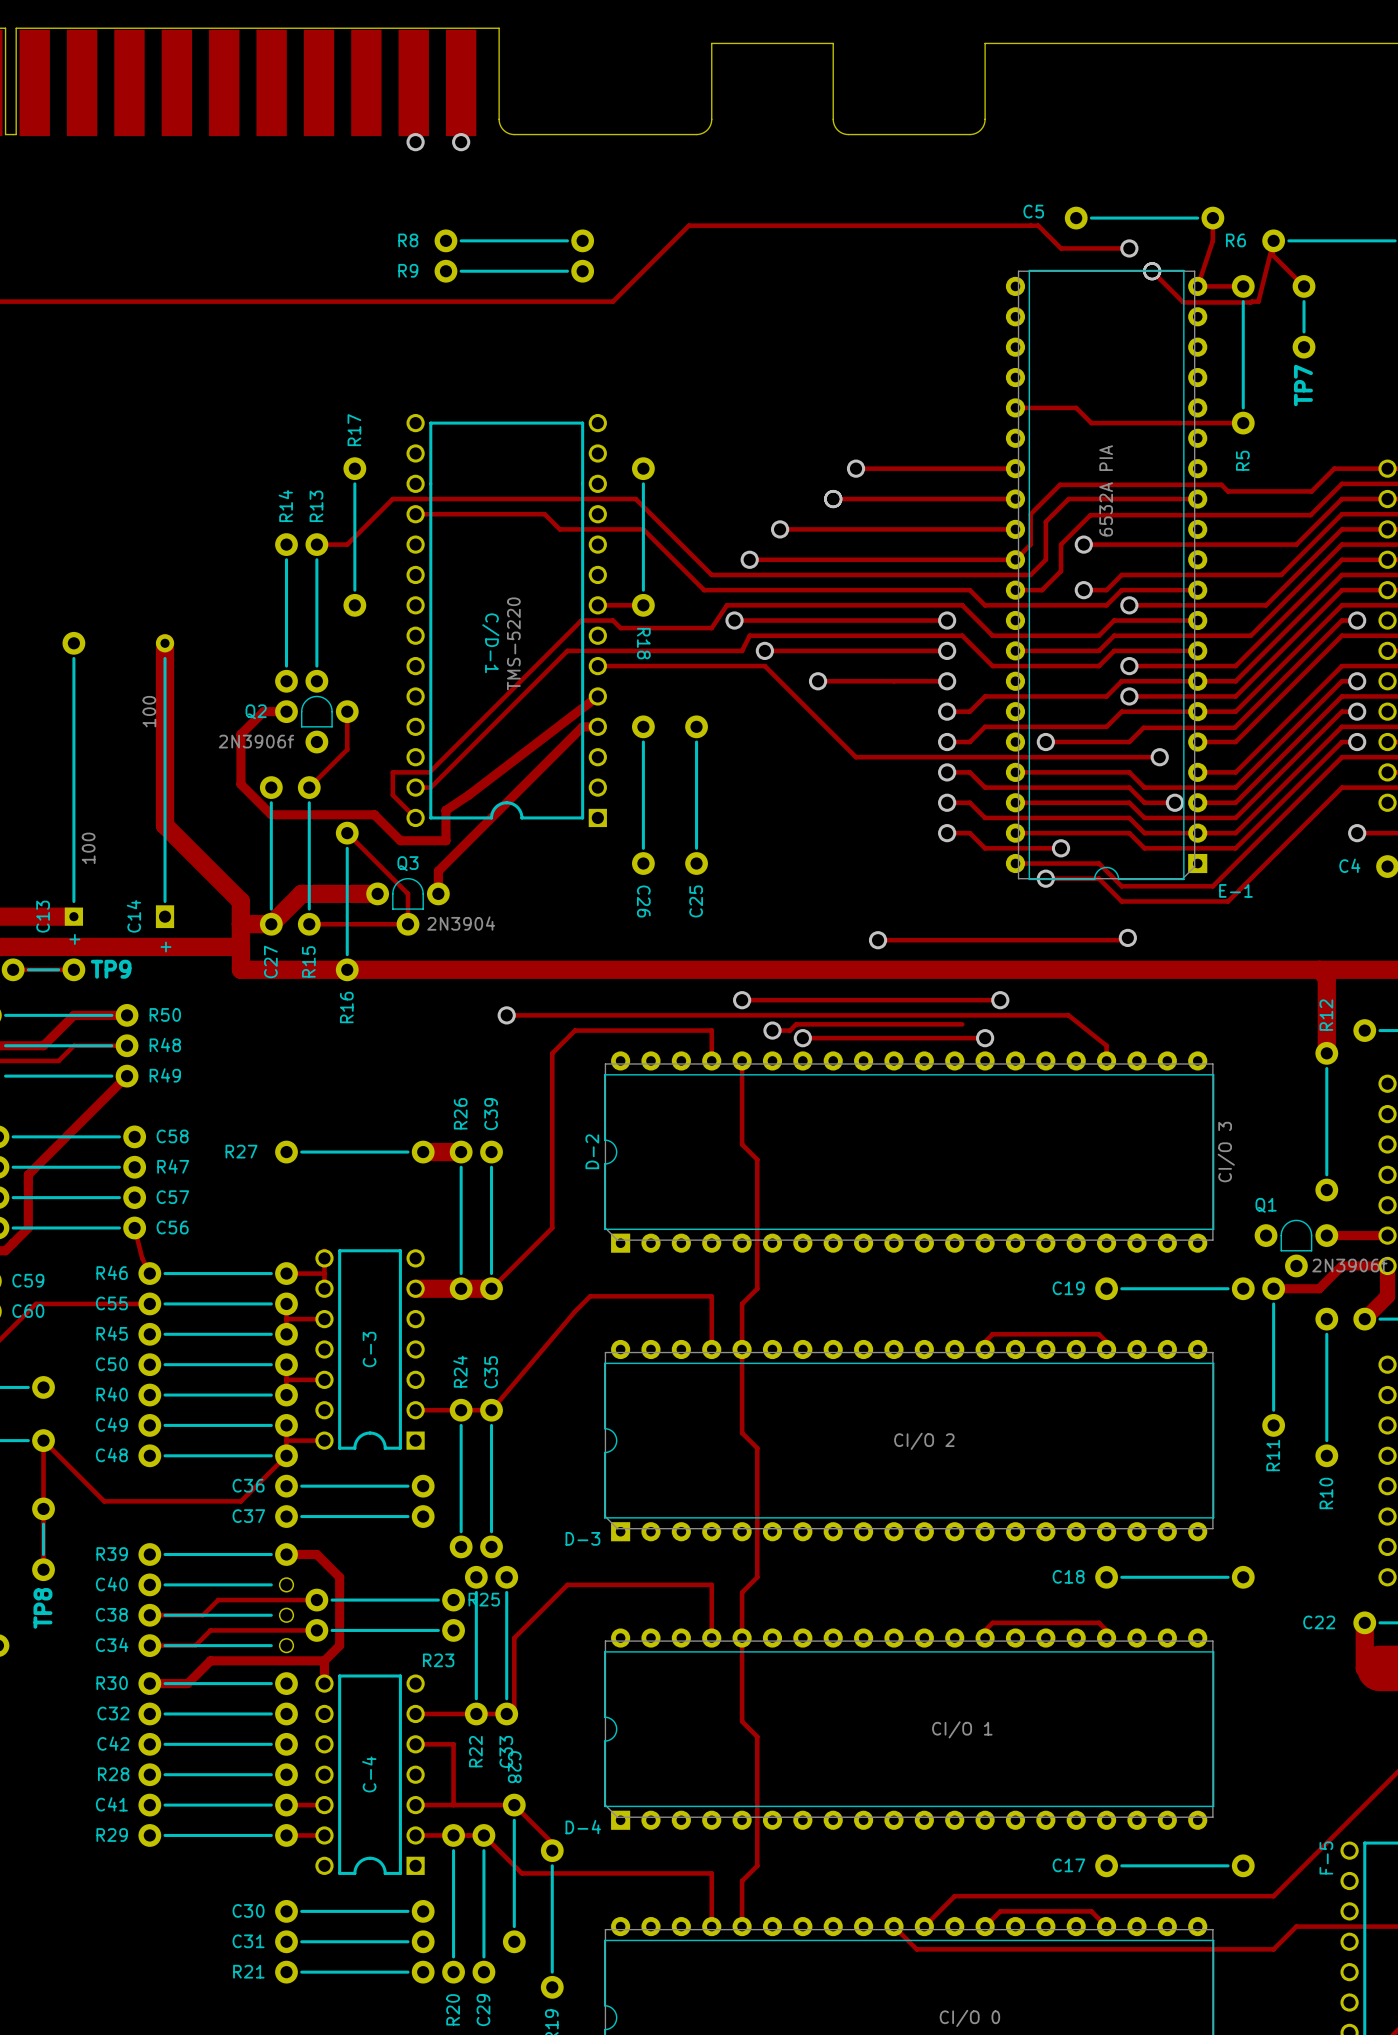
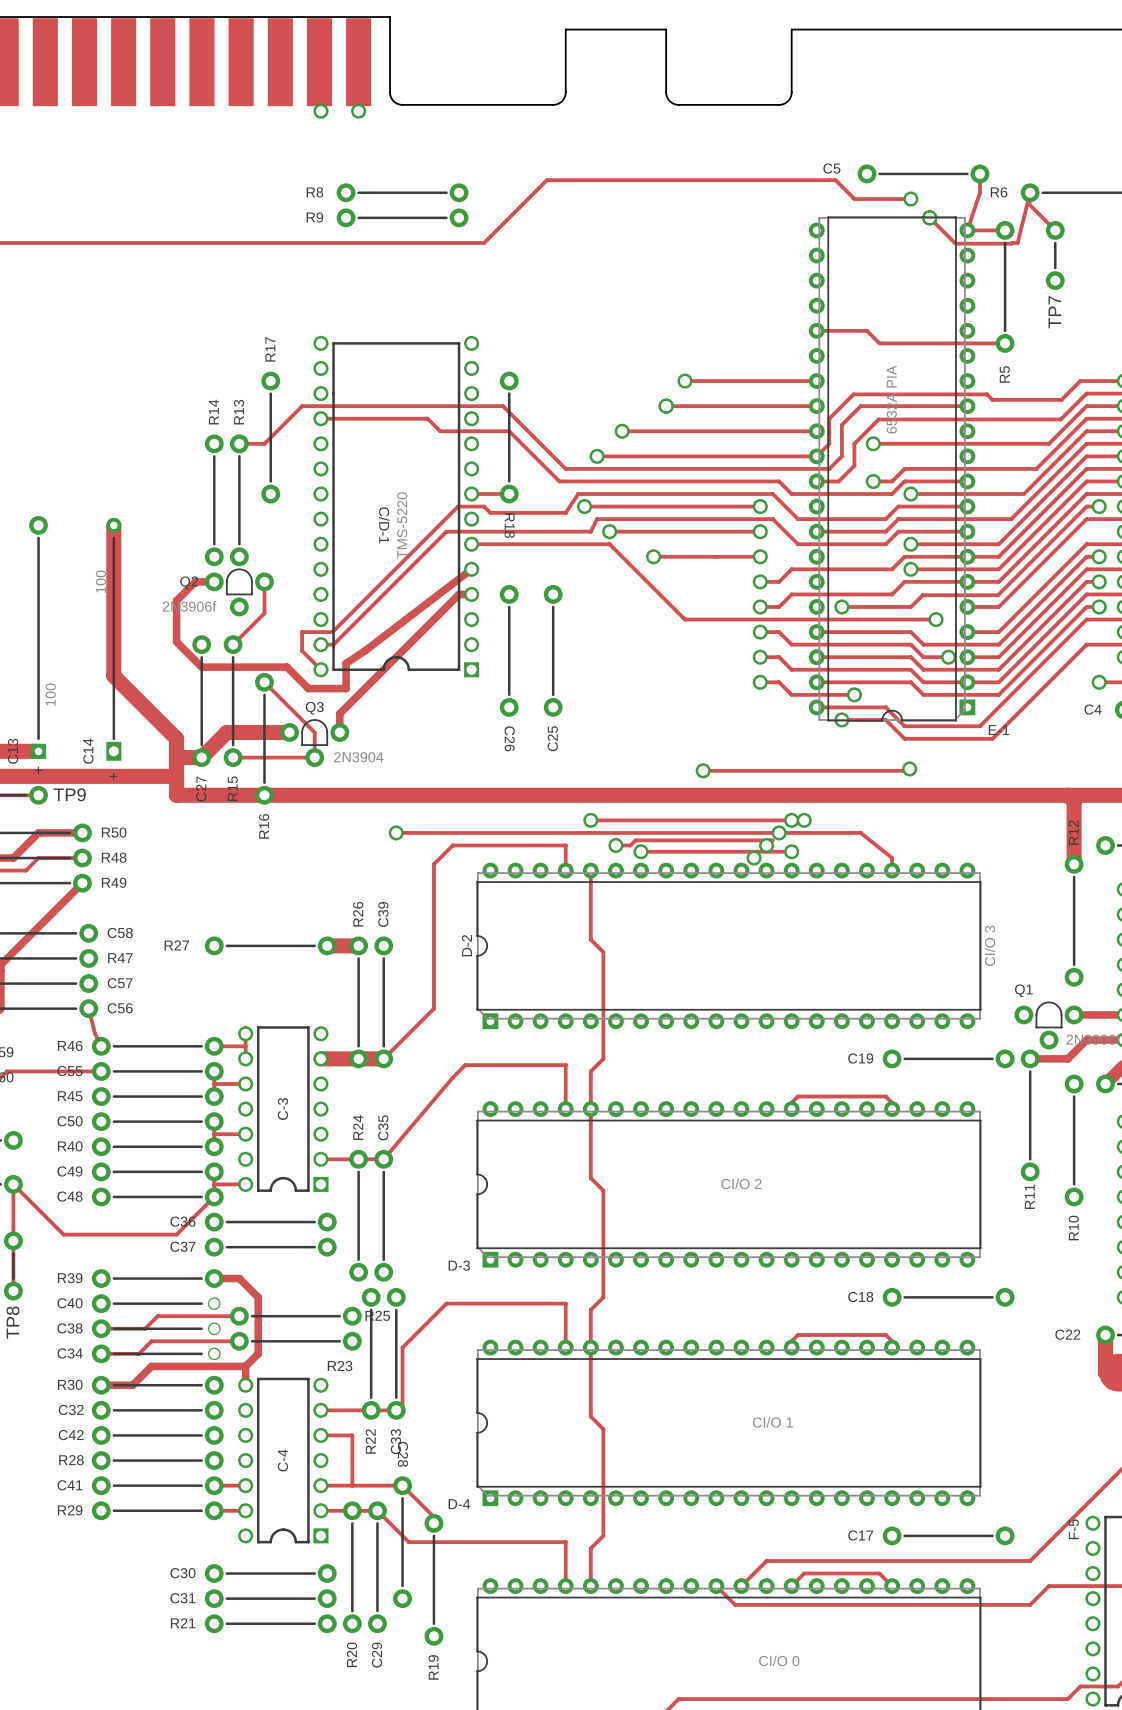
via: none -> (791, 820)
via: none -> (779, 832)
via: none -> (766, 845)
via: none -> (754, 858)

